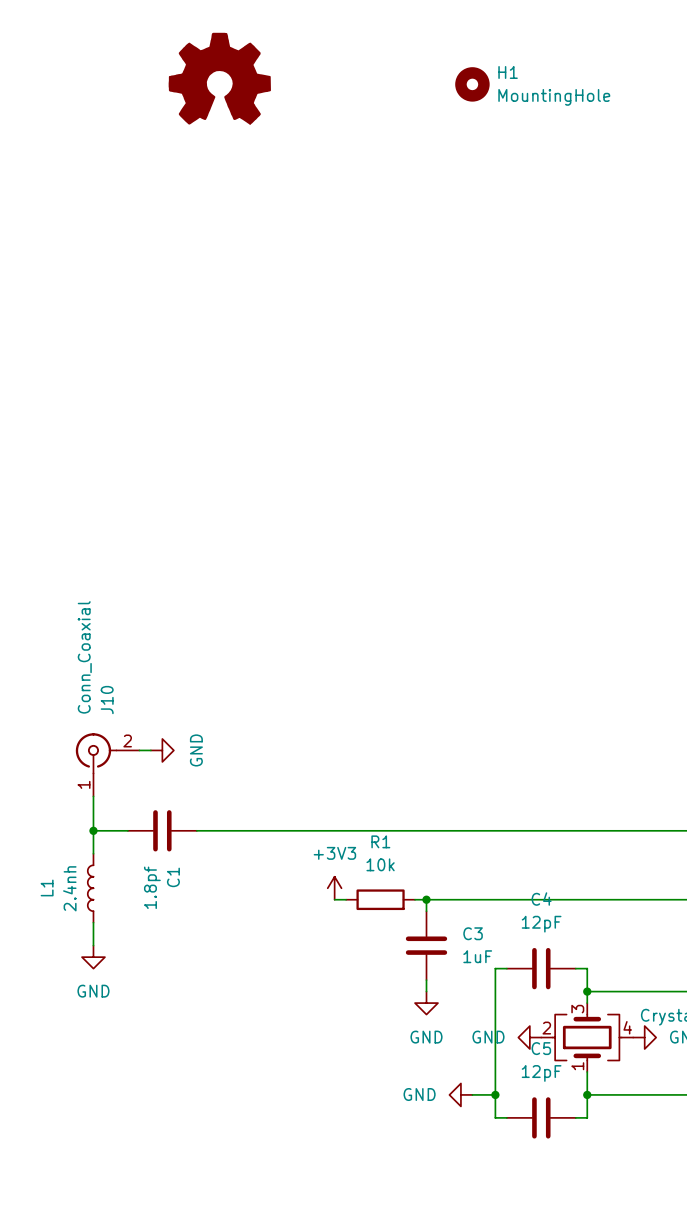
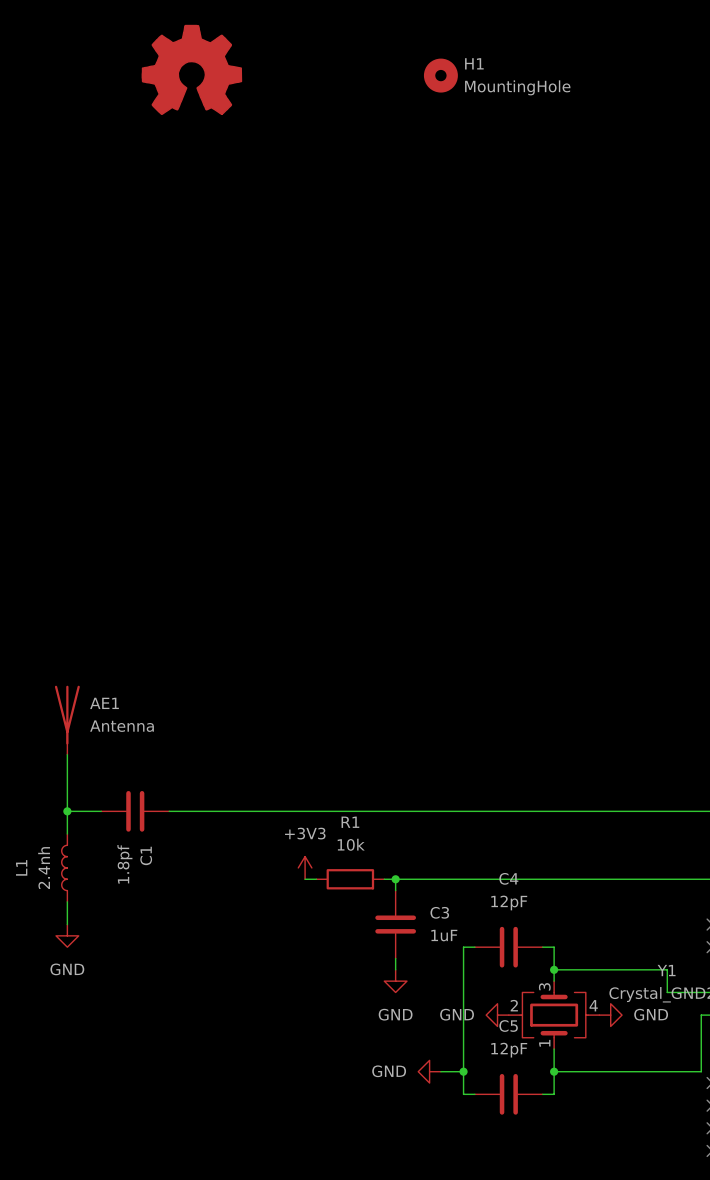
AE1: none -> Antenna (67, 720)
wire: (139, 750) (150, 750) -> none
power symbol: GND (162, 750) -> none
J10: Conn_Coaxial (107, 764) -> none

